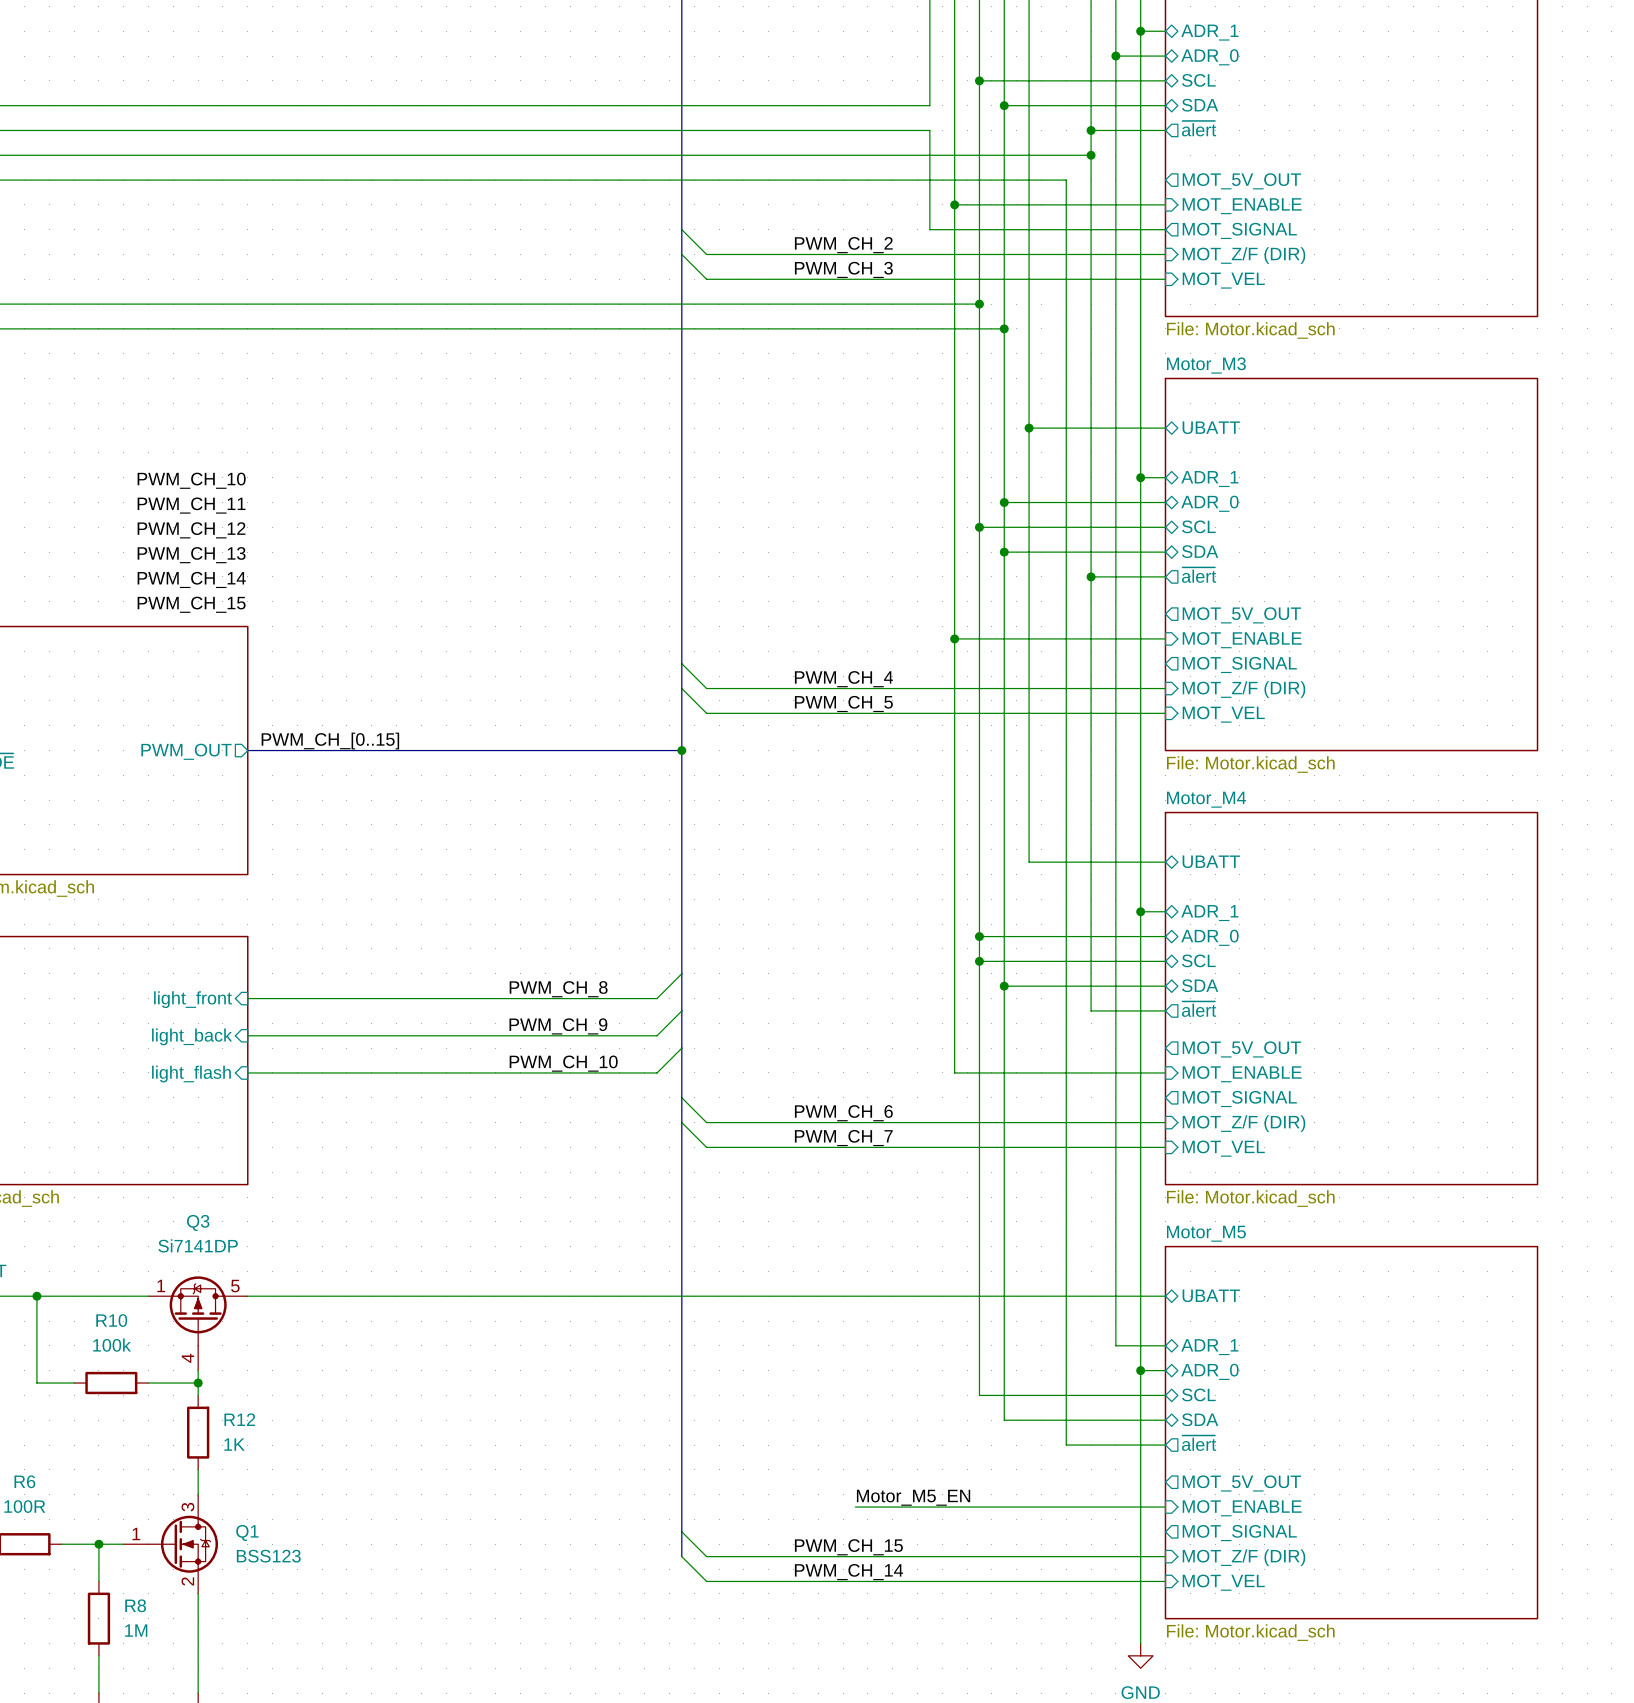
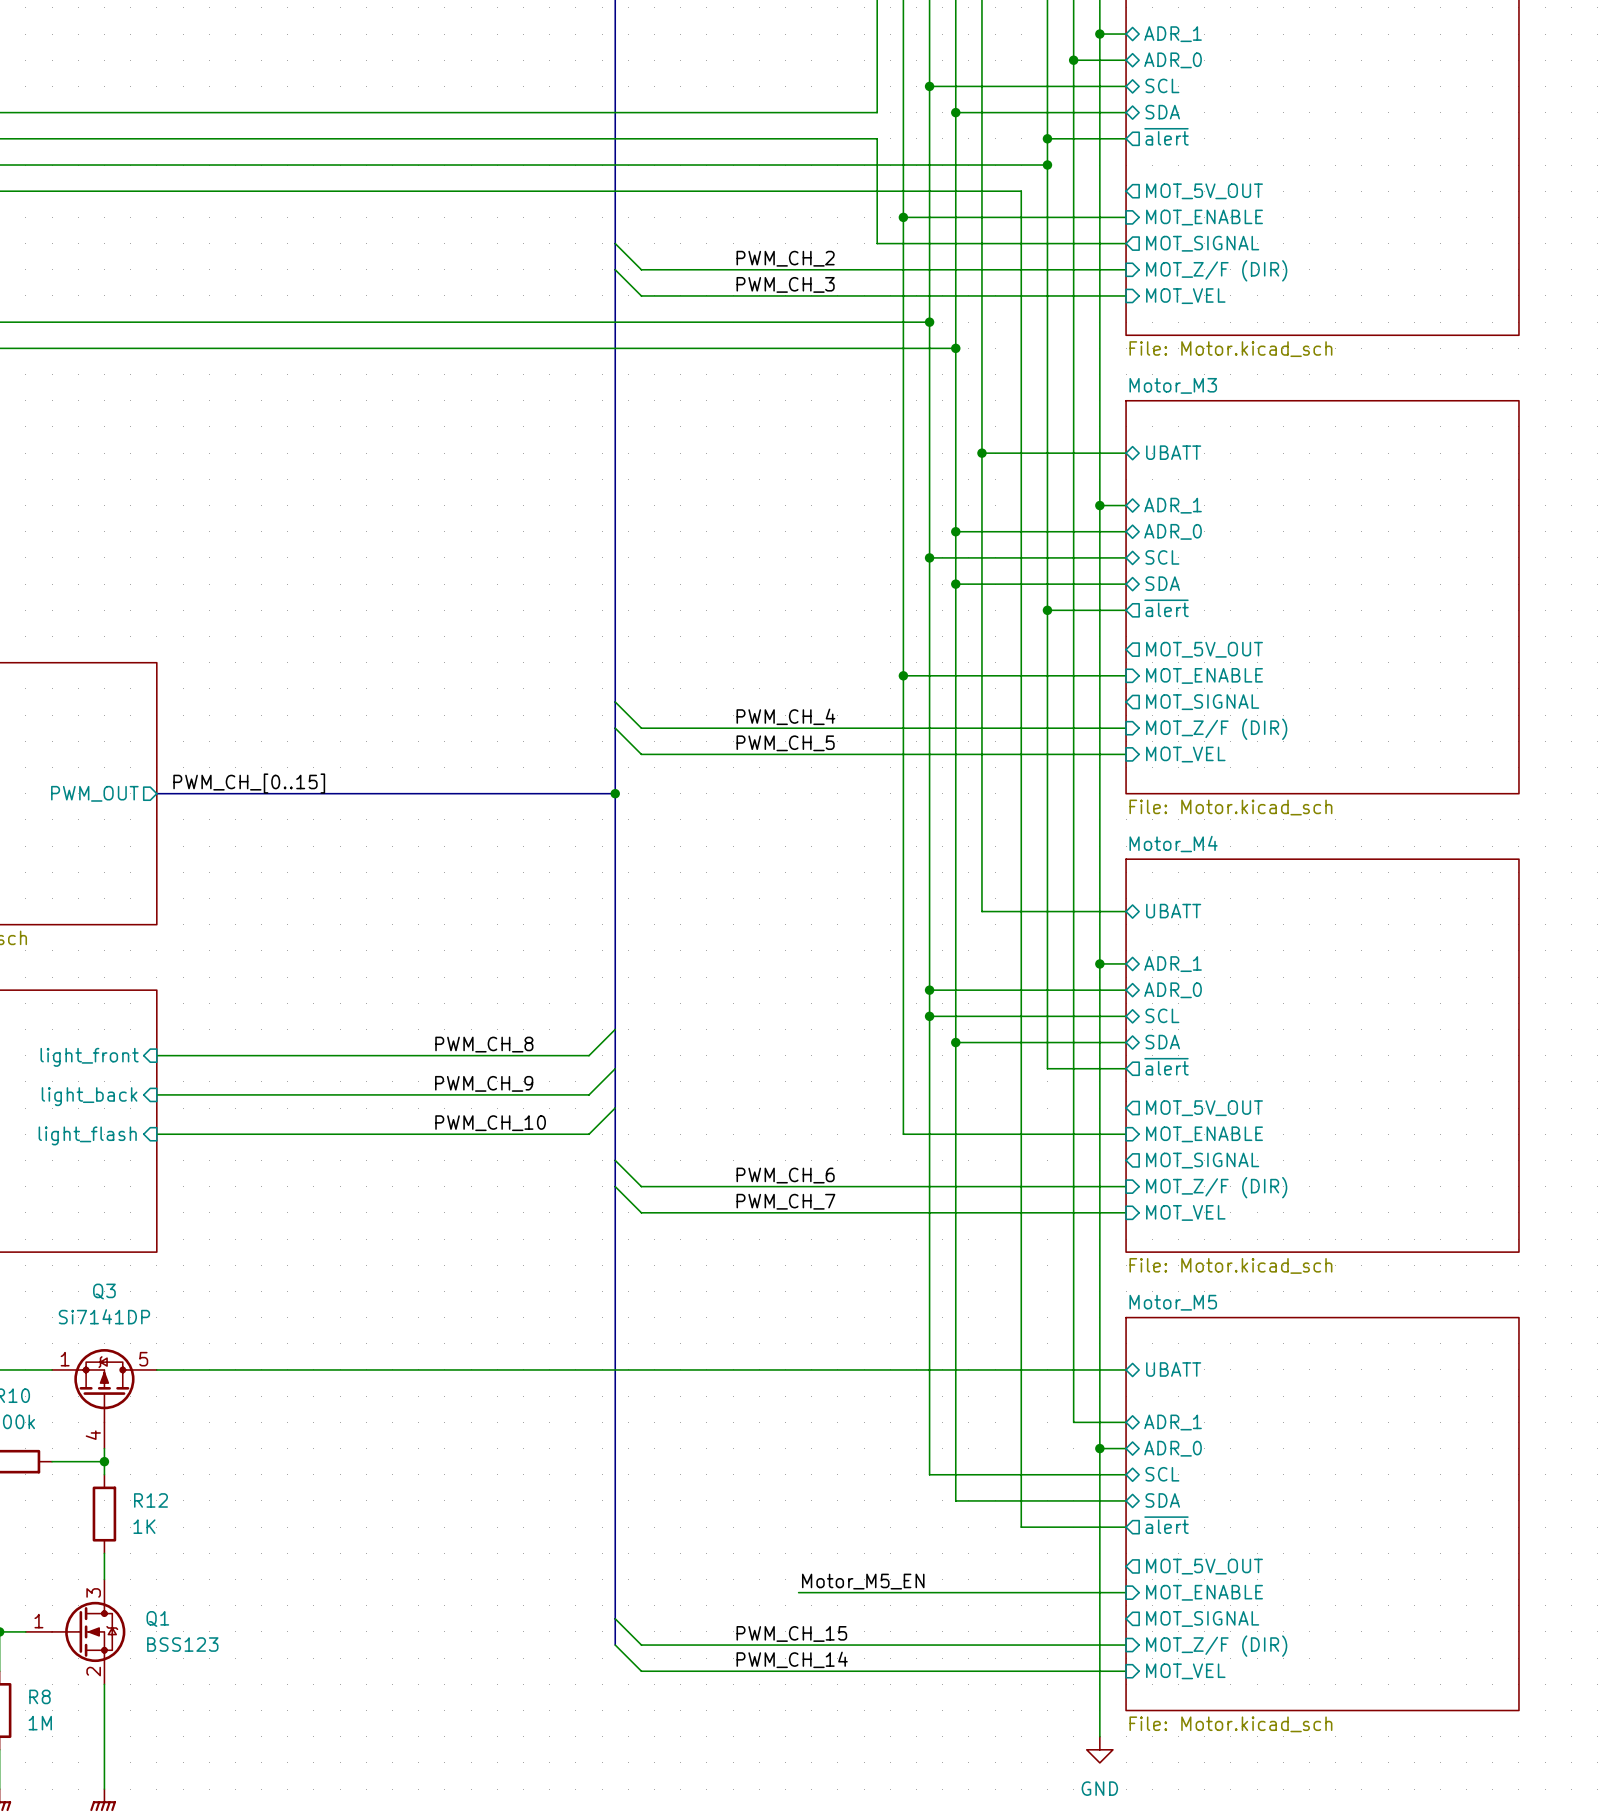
label: PWM_CH_10 (191, 480) -> none
label: PWM_CH_11 (191, 505) -> none
label: PWM_CH_12 (191, 530) -> none
label: PWM_CH_13 (191, 555) -> none
label: PWM_CH_14 (191, 579) -> none
label: PWM_CH_15 (191, 604) -> none

